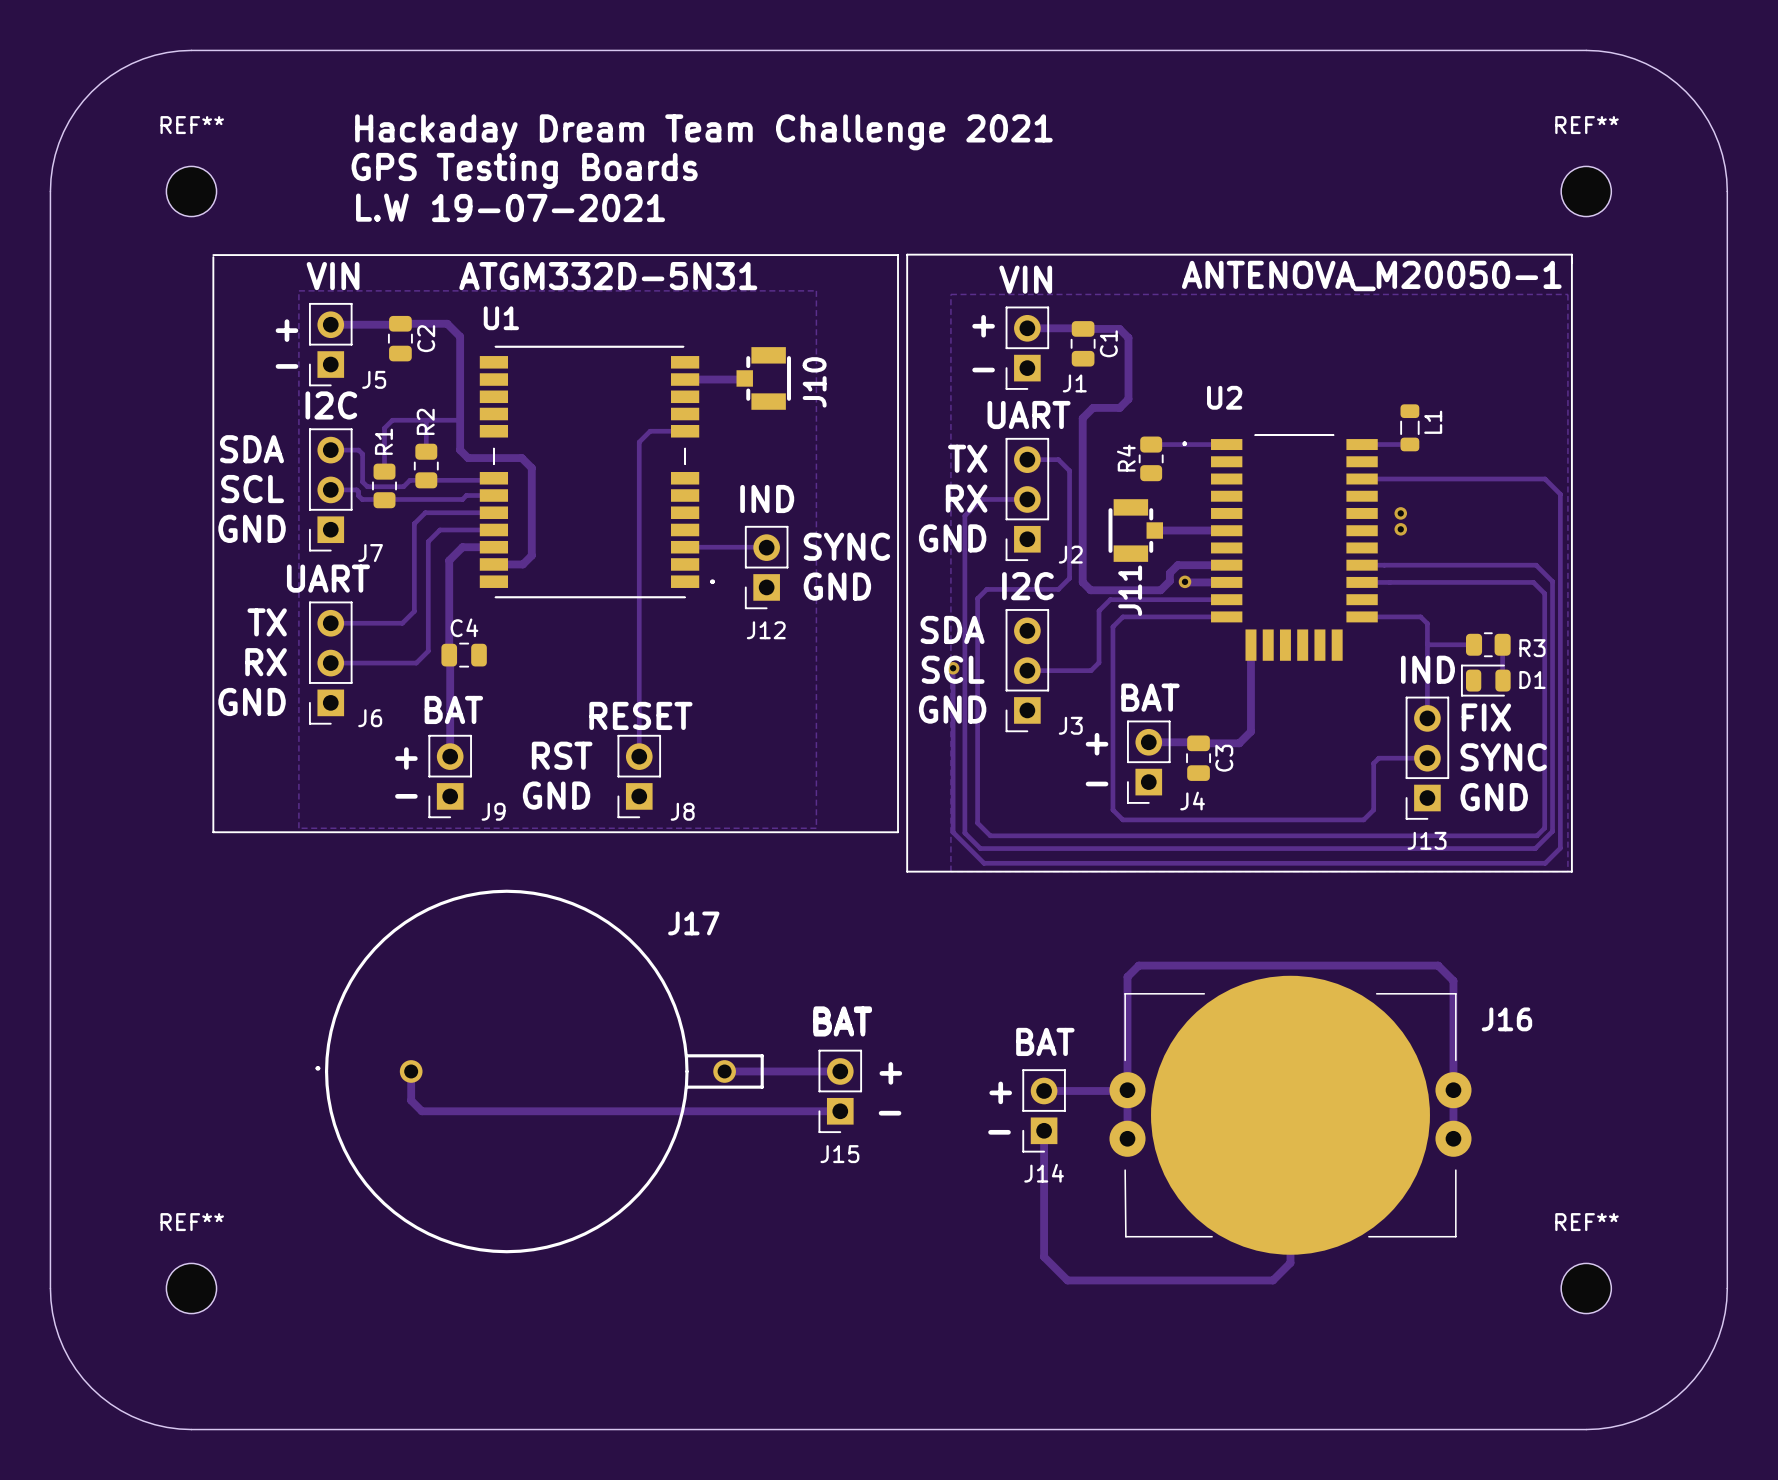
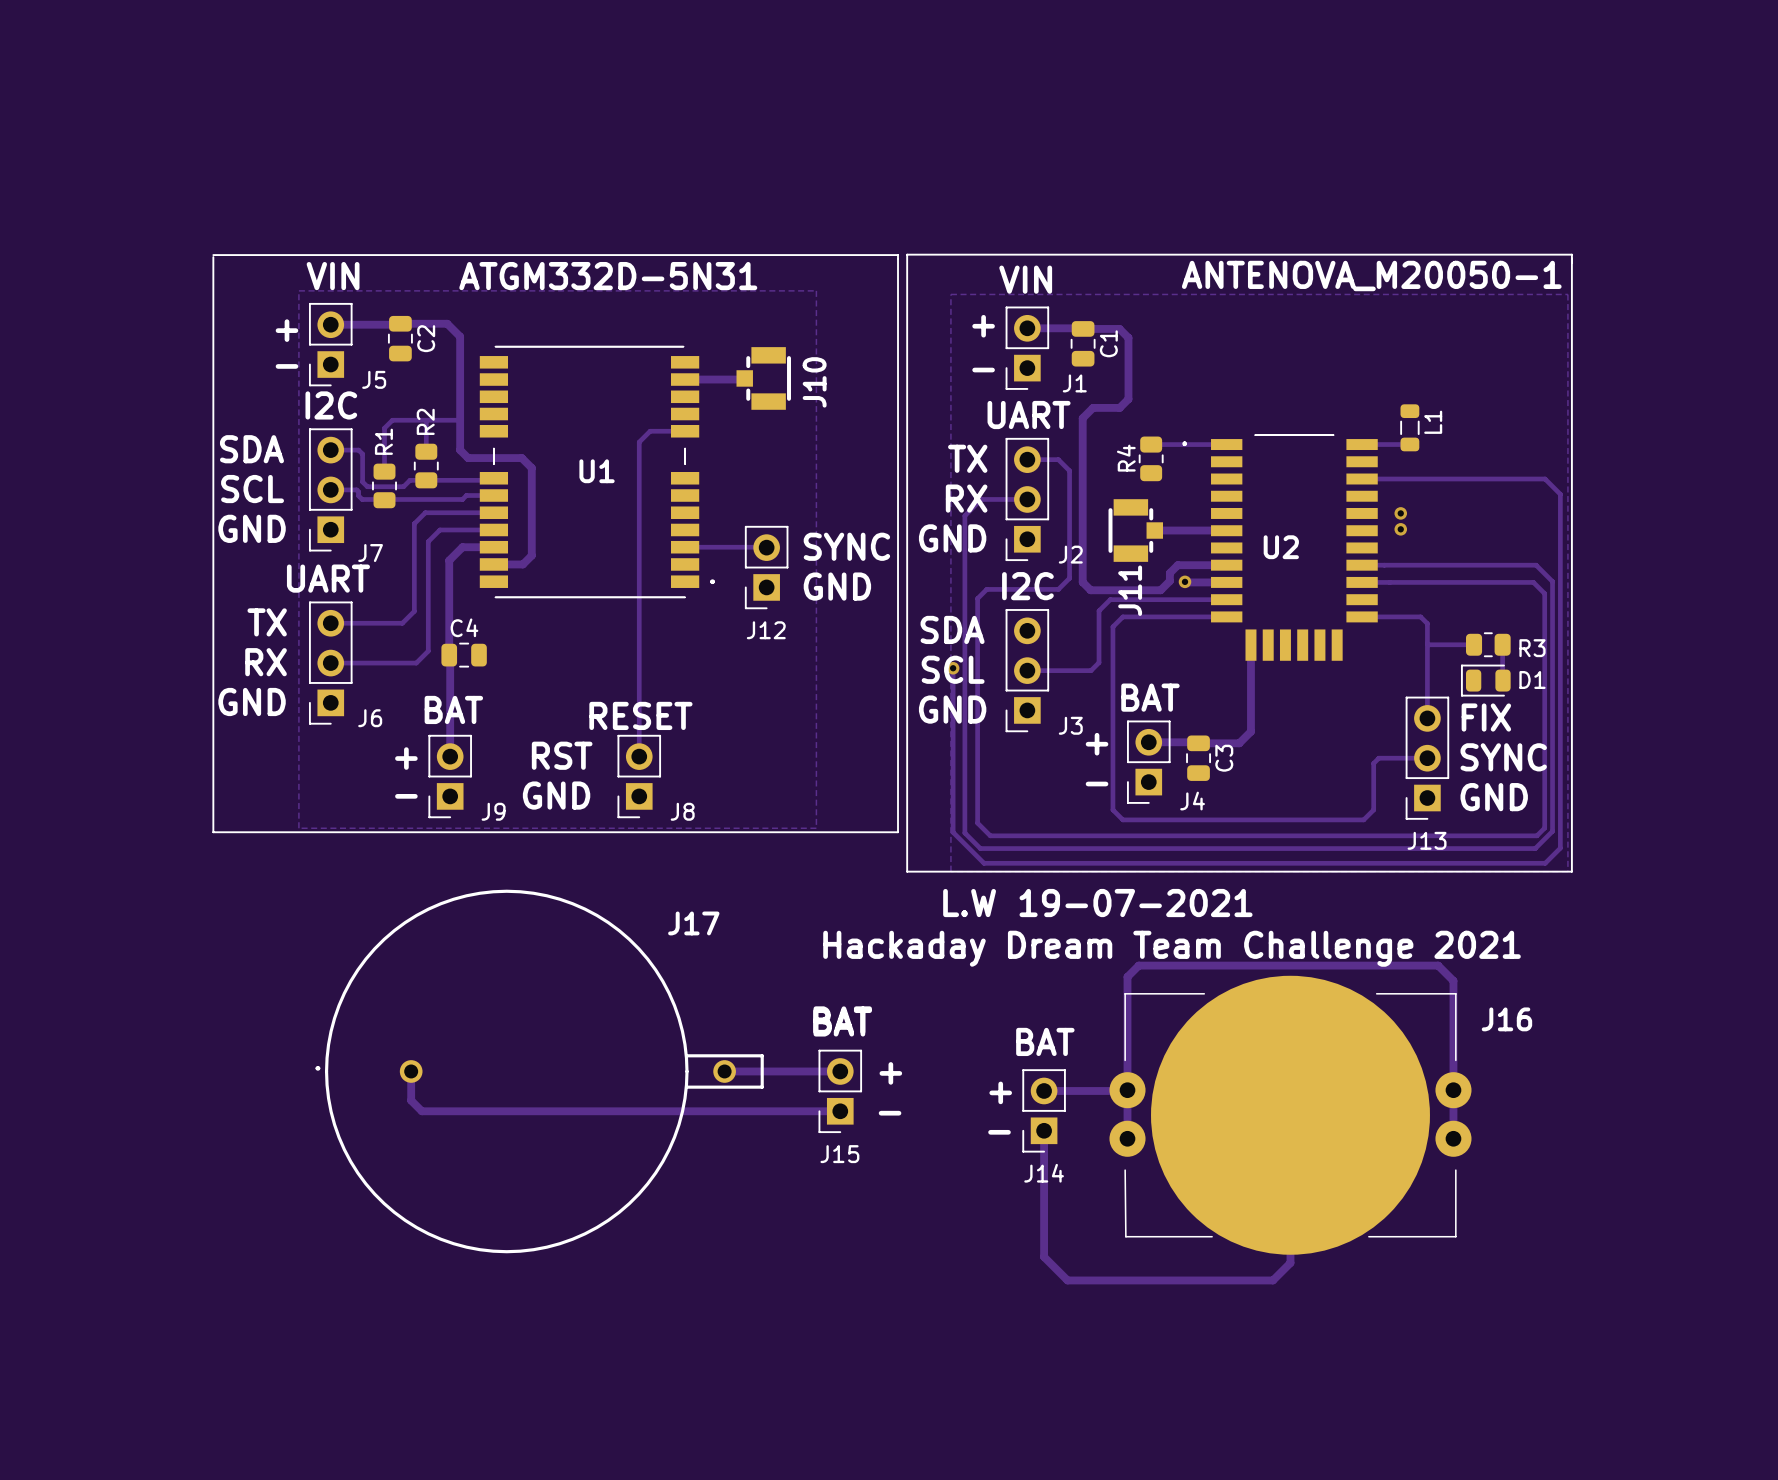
board edge: (191, 50) (1586, 50) (1610, 52) (1634, 58) (1656, 69) (1676, 83) (1701, 110) (1714, 131) (1725, 166) (1727, 191) (1727, 1288) (1725, 1312) (1718, 1336) (1708, 1359) (1694, 1379) (1667, 1404) (1645, 1416) (1622, 1424) (1586, 1429) (191, 1429) (166, 1427) (143, 1421) (120, 1410) (100, 1396) (83, 1379) (63, 1348) (55, 1325) (50, 1288) (50, 179) (55, 154) (69, 120) (83, 100) (100, 83) (120, 69) (143, 58) (166, 52) (191, 50) -> none
text: Hackaday Dream Team Challenge 2021 (703, 132) -> none
text: GPS Testing Boards (524, 170) -> none
REF**: (191, 191) -> none
REF**: (1586, 191) -> none
text: L.W (382, 207) -> none
text: 19-07-2021 (548, 208) -> none
U1 name position: U1 (501, 318) -> U1 (597, 471)
U2 name position: U2 (1224, 397) -> U2 (1281, 547)
text: IND (767, 498) -> none
text: IND (1427, 669) -> none
text: none -> L.W (969, 903)
text: none -> 19-07-2021 (1136, 903)
text: none -> Hackaday Dream Team Challenge 2021 (1172, 948)
REF**: (191, 1288) -> none
REF**: (1586, 1288) -> none

